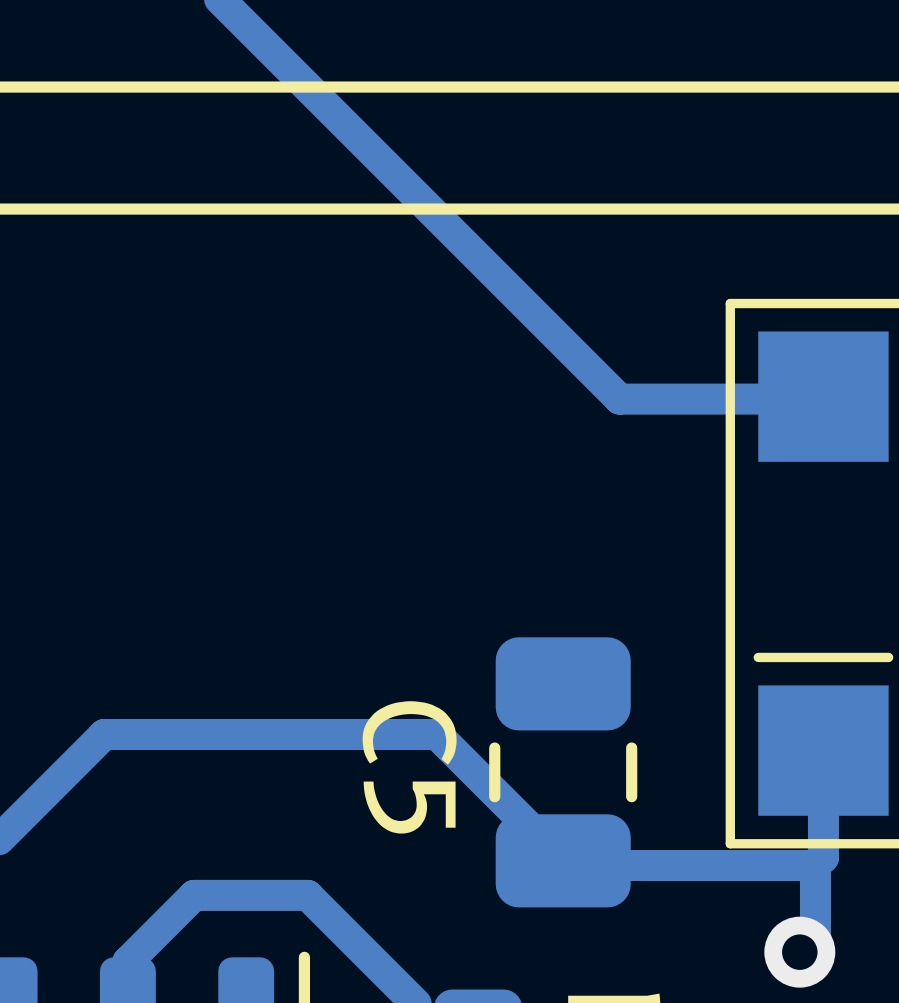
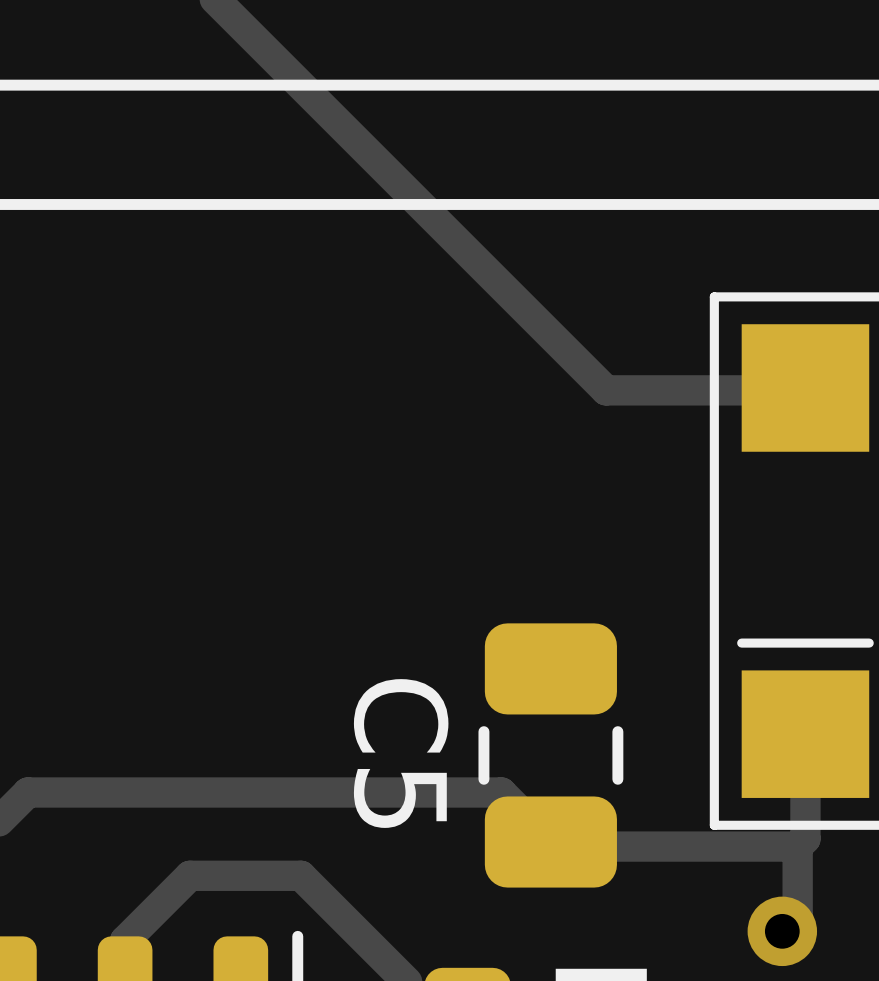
track: (512, 810) (436, 734) (104, 734) (28, 810) -> (501, 792) (27, 792)

